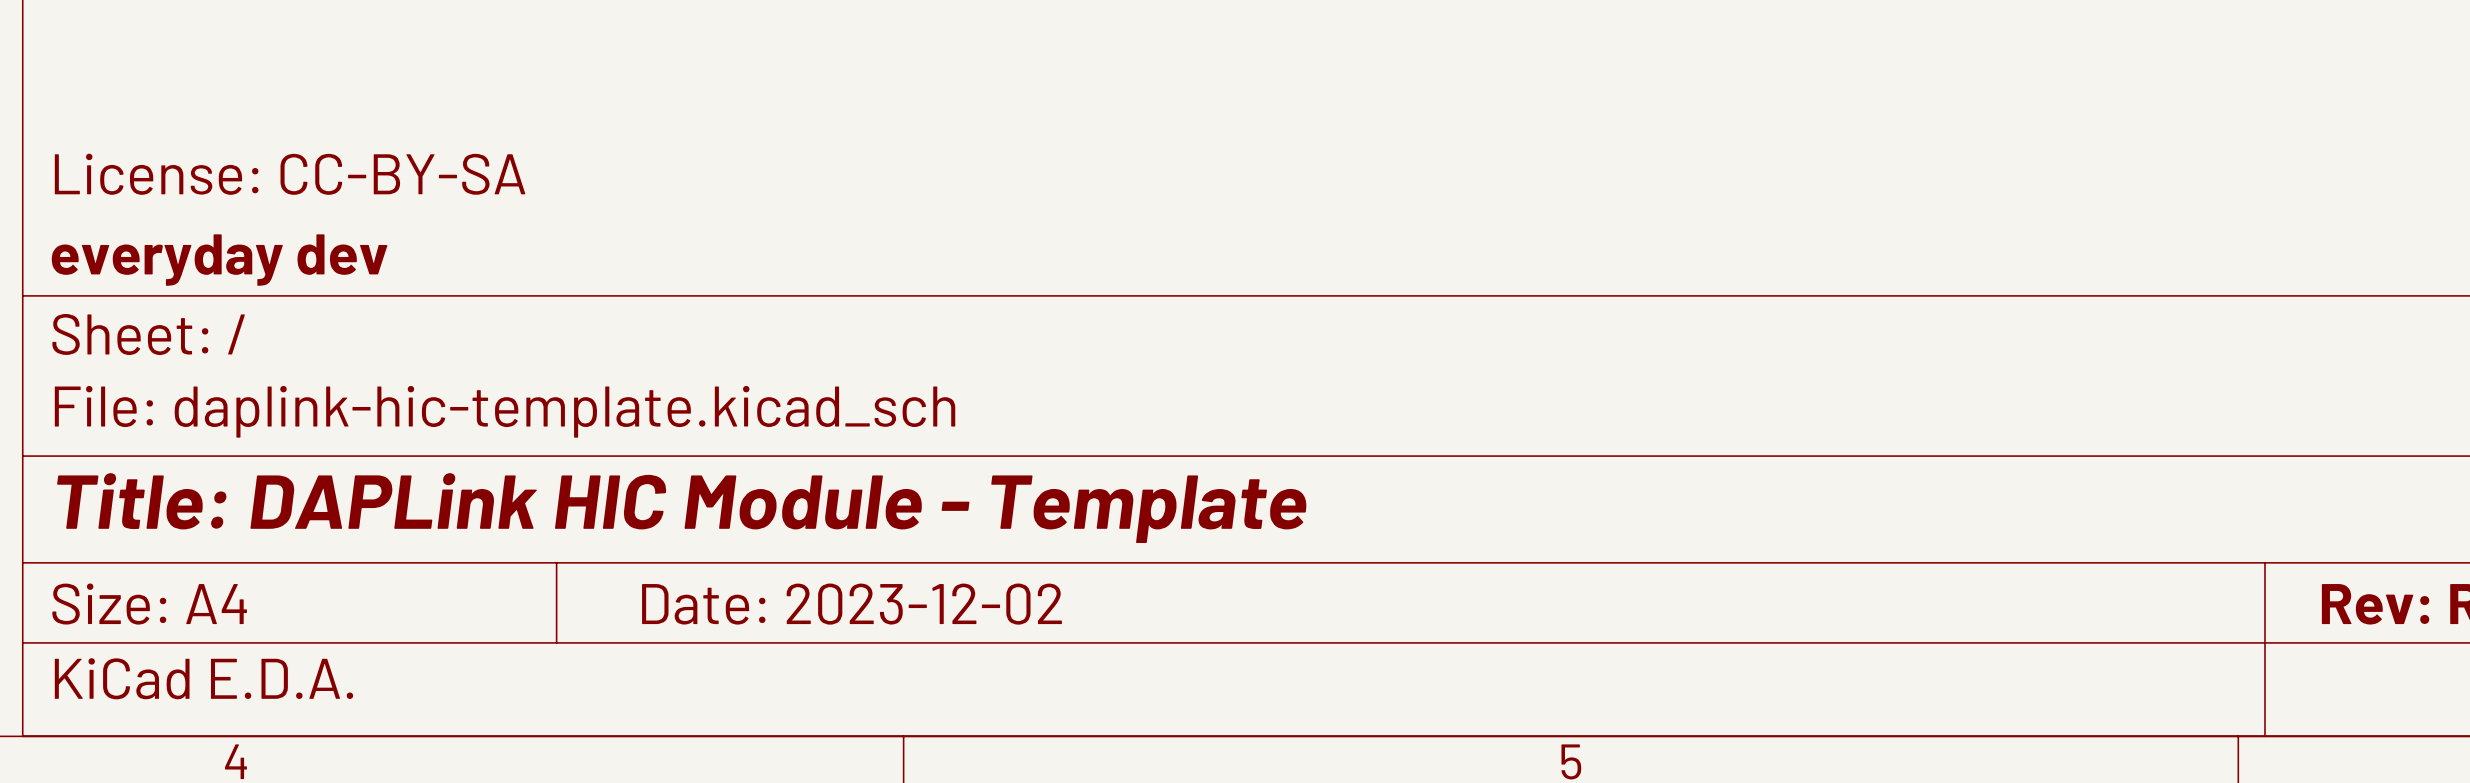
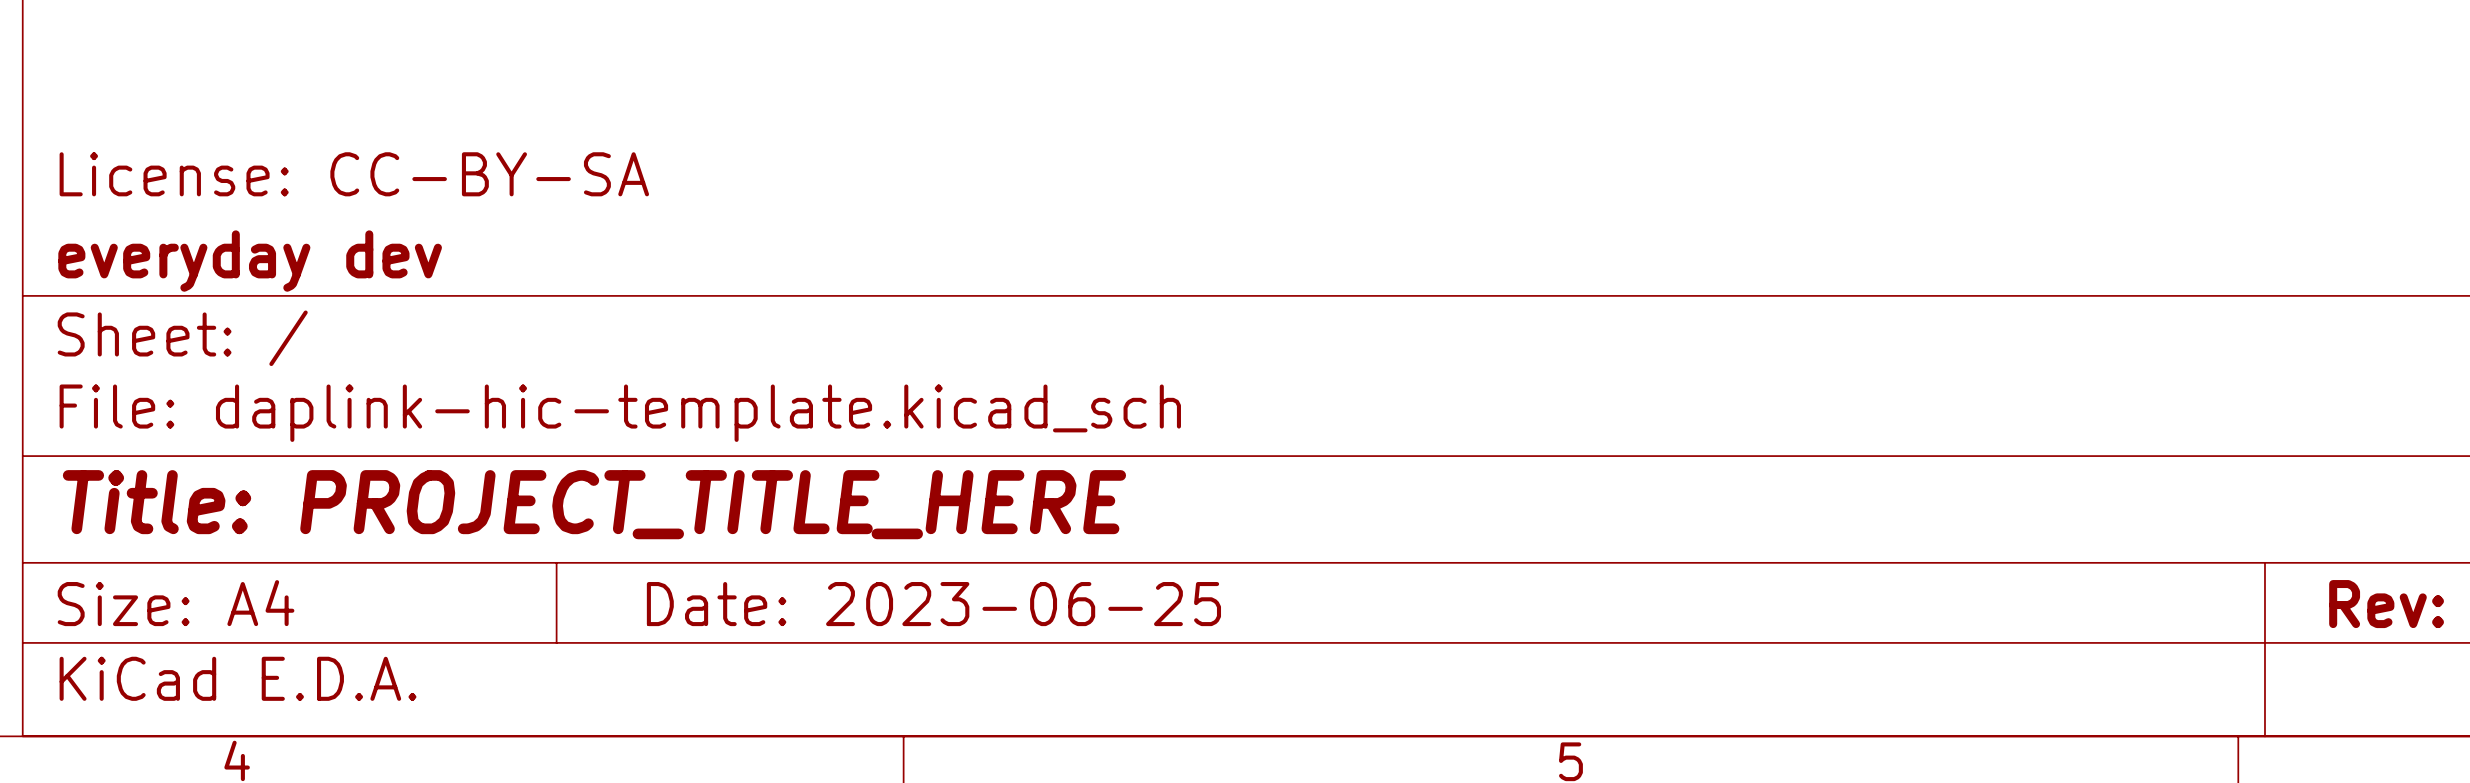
title block: Title: DAPLink HIC Module - Template (681, 508) -> Title: PROJECT_TITLE_HERE (594, 504)
title block: Date: 2023-12-02 (851, 604) -> Date: 2023-06-25 (933, 604)

